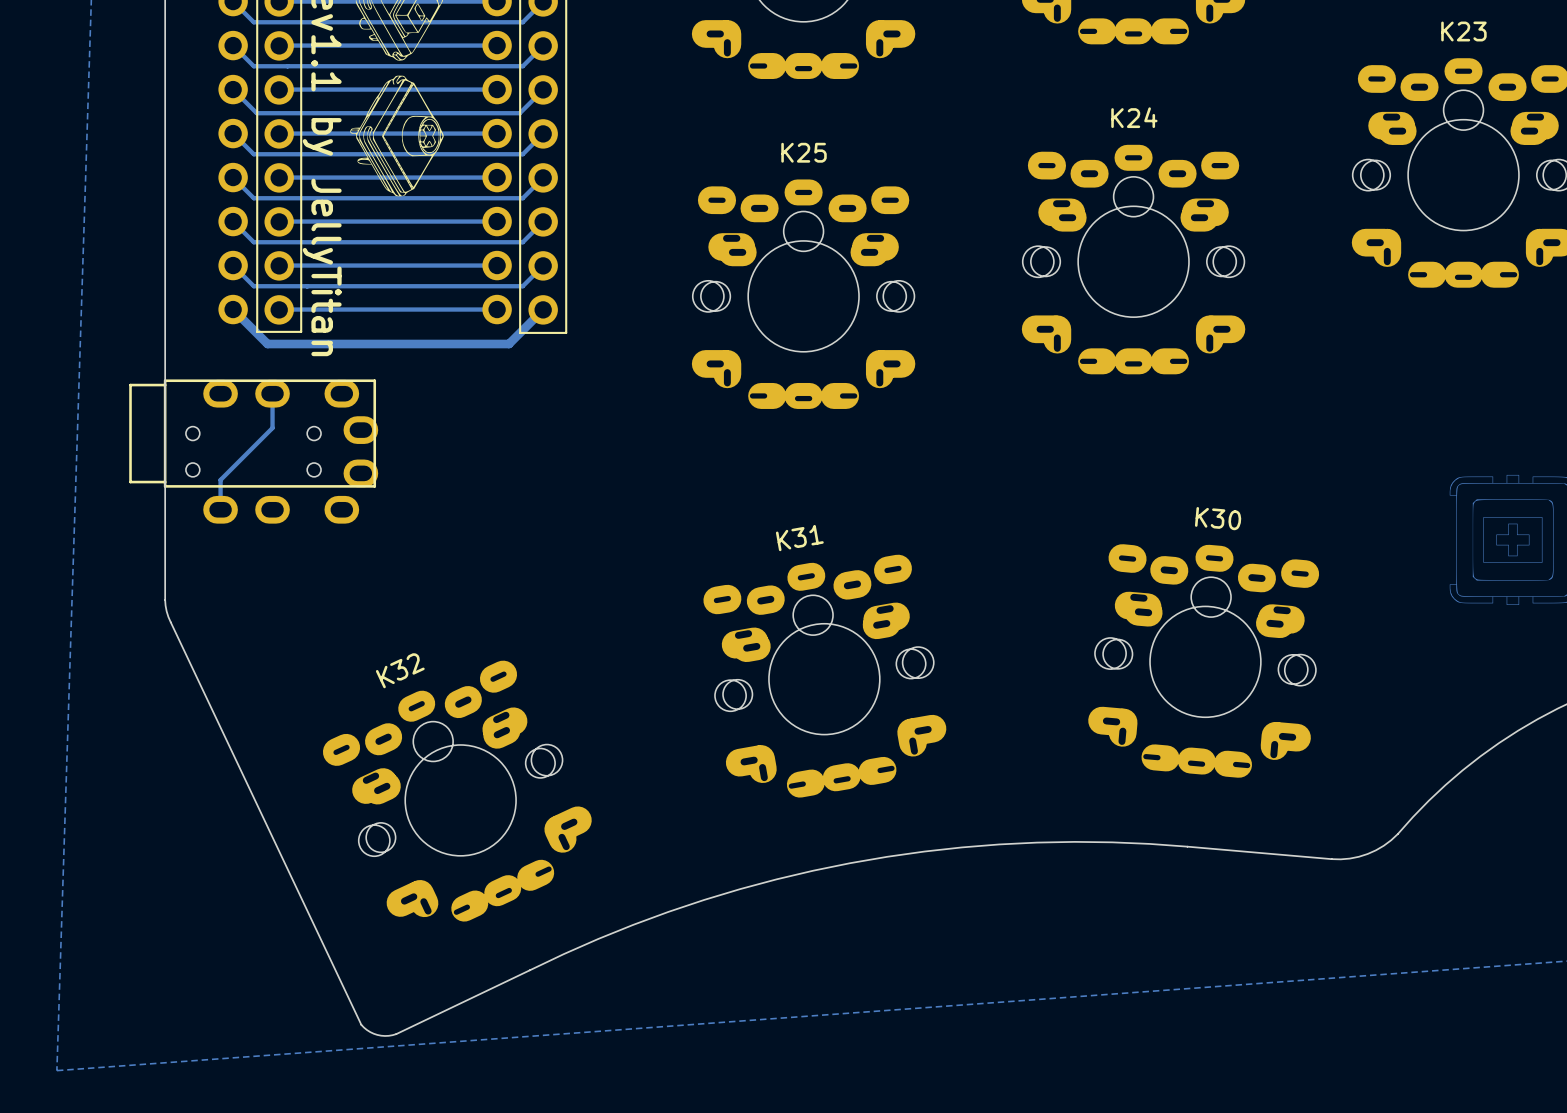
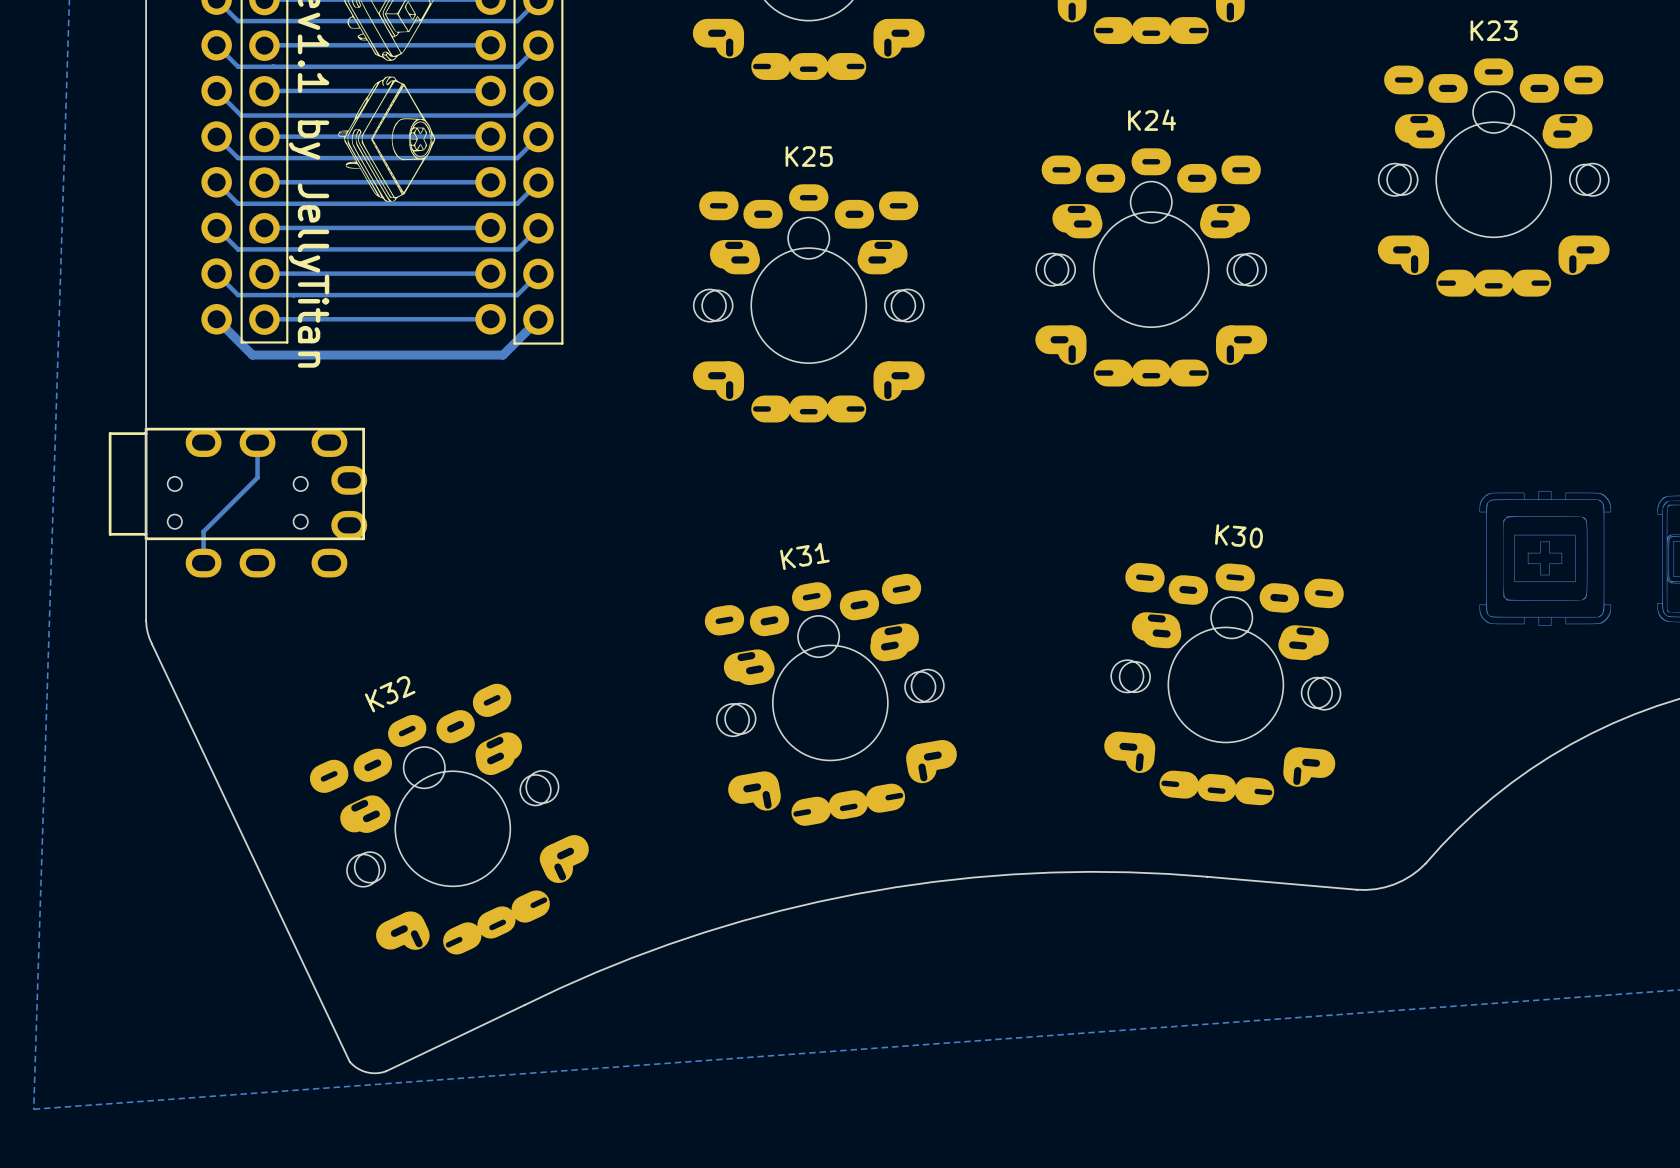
track: (272, 393) (272, 428) (220, 479) (220, 509) -> none
track: none -> (257, 442) (257, 477) (203, 531) (203, 563)
part position: (253, 451) -> (237, 502)

